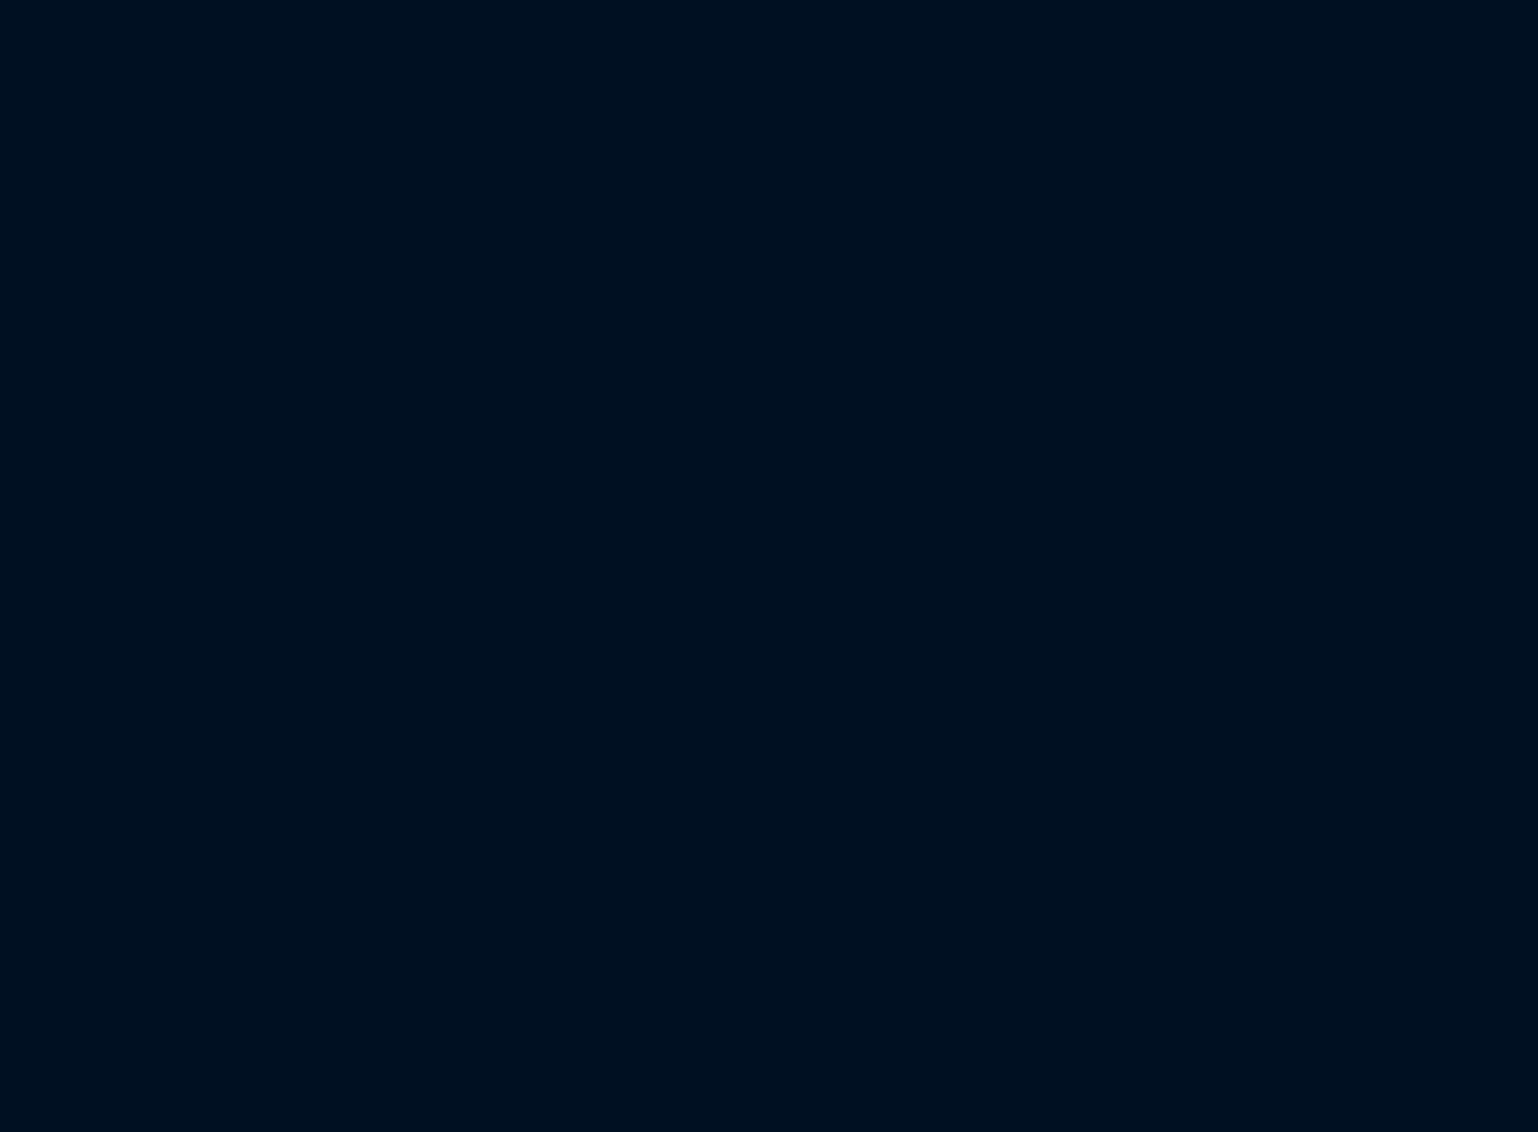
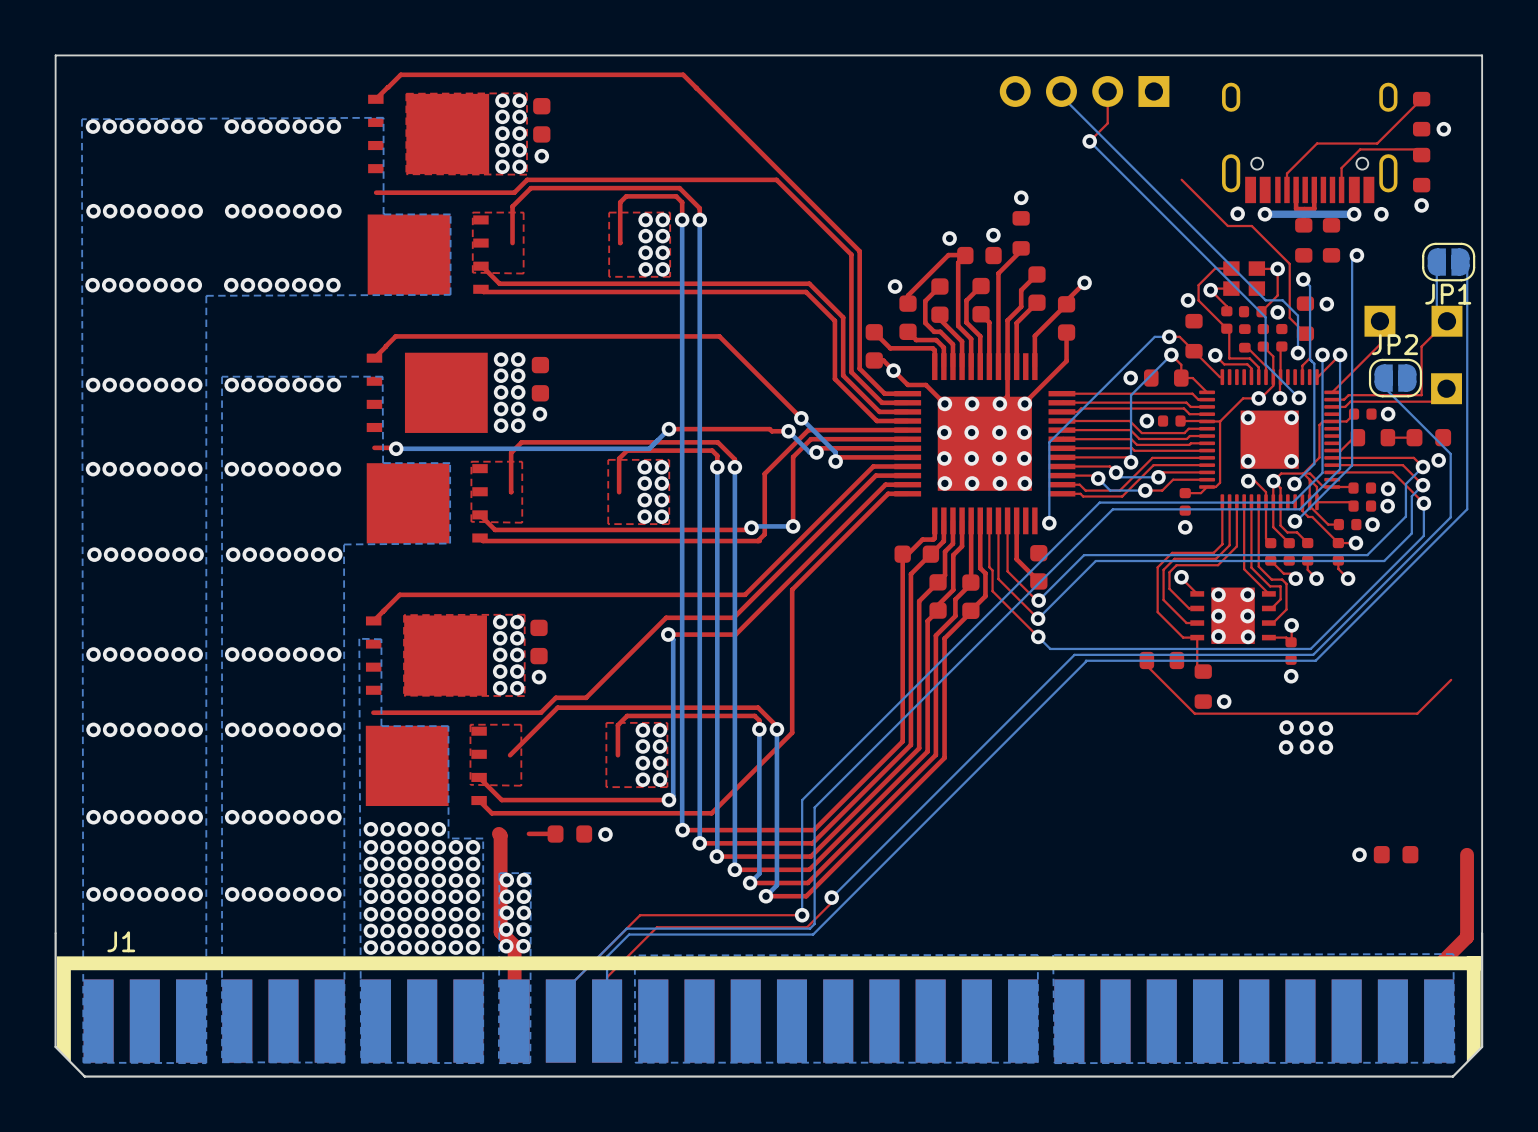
bottom track: none -> (1061, 91) (1061, 96) (1265, 300) (1282, 300) (1298, 315) (1298, 353)
part: none -> (1084, 91)
top track: none -> (1107, 91) (1107, 123) (1089, 141)
top zone outline: none -> (526, 93) (526, 174) (406, 174) (406, 93) (526, 93)
top track: none -> (375, 99) (400, 74) (683, 74) (859, 251) (859, 368) (884, 393) (907, 393)
top track: none -> (1421, 99) (1377, 143) (1317, 143) (1286, 173) (1286, 189)
via: none -> (502, 100)
via: none -> (519, 100)
part: none -> (1421, 114)
via: none -> (502, 116)
via: none -> (519, 116)
bottom zone outline: none -> (383, 117) (383, 214) (450, 214) (450, 294) (206, 295) (206, 1063) (83, 1062) (81, 119) (383, 117)
part: none -> (541, 120)
via: none -> (93, 126)
via: none -> (109, 126)
via: none -> (126, 126)
via: none -> (143, 126)
via: none -> (161, 126)
via: none -> (178, 126)
via: none -> (195, 126)
via: none -> (231, 126)
via: none -> (248, 126)
via: none -> (265, 126)
via: none -> (282, 126)
via: none -> (299, 126)
via: none -> (316, 126)
via: none -> (333, 126)
via: none -> (1443, 129)
part: none -> (428, 133)
via: none -> (502, 133)
via: none -> (519, 133)
bottom track: none -> (1089, 141) (1265, 317) (1265, 364) (1298, 397)
via: none -> (1089, 141)
part: none -> (1309, 142)
via: none -> (502, 150)
via: none -> (519, 150)
top track: none -> (1421, 155) (1415, 149) (1360, 149) (1341, 168) (1341, 189)
via: none -> (541, 156)
via: none -> (502, 166)
via: none -> (519, 166)
part: none -> (1421, 170)
top track: none -> (1181, 179) (1227, 226) (1251, 226) (1289, 263) (1289, 317) (1310, 338) (1310, 358) (1302, 365) (1302, 377)
top track: none -> (1314, 189) (1313, 209) (1296, 208) (1296, 189)
top track: none -> (376, 192) (514, 192) (527, 179) (776, 179) (851, 254) (851, 372) (882, 402) (907, 402)
via: none -> (1021, 197)
via: none -> (1421, 205)
via: none -> (93, 211)
via: none -> (110, 211)
via: none -> (127, 211)
via: none -> (144, 211)
via: none -> (161, 211)
via: none -> (178, 211)
via: none -> (195, 211)
via: none -> (232, 211)
via: none -> (248, 211)
via: none -> (265, 211)
via: none -> (283, 211)
via: none -> (300, 211)
via: none -> (317, 211)
via: none -> (334, 211)
top zone outline: none -> (523, 212) (523, 273) (472, 272) (472, 212) (523, 212)
top zone outline: none -> (670, 212) (609, 212) (609, 276) (670, 276) (670, 212)
via: none -> (1237, 213)
via: none -> (1264, 214)
bottom track: none -> (1354, 214) (1264, 214)
via: none -> (1354, 214)
via: none -> (1381, 214)
via: none -> (645, 219)
via: none -> (662, 219)
top track: none -> (682, 219) (682, 202) (676, 196) (626, 196) (620, 202) (620, 242)
bottom track: none -> (682, 219) (682, 830)
via: none -> (682, 219)
top track: none -> (699, 219) (699, 208) (679, 188) (530, 188) (512, 206) (512, 243)
bottom track: none -> (699, 219) (699, 843)
via: none -> (699, 219)
part: none -> (1021, 233)
via: none -> (993, 235)
via: none -> (645, 236)
via: none -> (662, 236)
via: none -> (949, 238)
part: none -> (1303, 240)
part: none -> (1331, 240)
top track: none -> (1021, 248) (1021, 250) (998, 273) (998, 366)
via: none -> (645, 252)
via: none -> (662, 252)
part: none -> (428, 254)
part: none -> (979, 255)
bottom track: none -> (1356, 255) (1352, 260) (1352, 465) (1294, 521)
via: none -> (1356, 255)
bottom track: none -> (1436, 262) (1436, 311) (1446, 321)
JP1: none -> (1448, 262)
bottom track: none -> (1460, 262) (1467, 268) (1467, 509) (1315, 660) (1085, 660) (813, 934) (629, 934) (607, 956) (607, 1021)
top track: none -> (480, 266) (499, 283) (809, 283) (843, 317) (843, 375) (879, 411) (907, 411)
top track: none -> (1231, 268) (1215, 268) (1198, 285) (1198, 300) (1229, 331) (1229, 358) (1249, 358) (1258, 367) (1258, 377)
top track: none -> (1256, 268) (1277, 268) (1277, 295) (1261, 311)
via: none -> (1277, 268)
via: none -> (645, 269)
via: none -> (662, 269)
top track: none -> (1036, 274) (1021, 290) (1021, 306) (1007, 320) (1007, 396) (999, 403)
part: none -> (1244, 278)
bottom track: none -> (1303, 279) (1310, 286) (1310, 359) (1314, 363) (1314, 464) (1294, 483)
via: none -> (1303, 279)
top track: none -> (1084, 282) (1034, 336) (1034, 366)
via: none -> (1084, 282)
via: none -> (92, 285)
via: none -> (109, 285)
via: none -> (126, 285)
via: none -> (143, 285)
via: none -> (160, 285)
via: none -> (177, 285)
via: none -> (194, 285)
via: none -> (231, 285)
via: none -> (247, 285)
via: none -> (265, 285)
via: none -> (282, 285)
via: none -> (299, 285)
via: none -> (316, 285)
via: none -> (333, 285)
via: none -> (895, 286)
top track: none -> (939, 286) (925, 301) (925, 322) (934, 331) (940, 331) (952, 344) (952, 366)
top track: none -> (981, 286) (966, 300) (966, 322) (980, 336) (980, 366)
part: none -> (1036, 288)
top track: none -> (1231, 288) (1210, 290) (1226, 306) (1226, 311)
top track: none -> (480, 289) (483, 291) (806, 291) (834, 320) (834, 378) (876, 421) (907, 421)
via: none -> (1210, 290)
part: none -> (939, 300)
part: none -> (981, 300)
via: none -> (1187, 300)
top track: none -> (1036, 302) (1016, 323) (1016, 366)
top track: none -> (908, 303) (908, 295) (948, 255) (964, 255) (958, 262) (958, 325) (971, 338) (971, 366)
via: none -> (1326, 304)
part: none -> (1252, 311)
via: none -> (1277, 312)
top track: none -> (939, 314) (939, 319) (962, 341) (962, 366)
top track: none -> (981, 314) (989, 322) (989, 366)
part: none -> (908, 317)
part: none -> (1066, 318)
part: none -> (1305, 318)
part: none -> (1226, 319)
top track: none -> (1379, 321) (1379, 344) (1332, 392)
part: none -> (1379, 321)
top track: none -> (1446, 321) (1421, 346) (1421, 395) (1348, 395) (1344, 399) (1332, 399)
part: none -> (1446, 321)
top track: none -> (908, 331) (916, 340) (936, 340) (943, 347) (943, 366)
top track: none -> (874, 332) (890, 348) (932, 348) (934, 350) (934, 366)
top track: none -> (1066, 332) (1066, 361) (1024, 403)
top track: none -> (1169, 336) (1179, 336) (1219, 377) (1222, 377)
bottom track: none -> (1169, 336) (1154, 336) (1049, 442) (1049, 523)
via: none -> (1169, 336)
part: none -> (1194, 336)
part: none -> (1263, 337)
part: none -> (1281, 337)
part: none -> (1244, 338)
part: none -> (874, 346)
top track: none -> (1263, 346) (1273, 356) (1273, 385) (1260, 398)
top track: none -> (1281, 346) (1279, 398)
top track: none -> (1244, 347) (1247, 347) (1266, 366) (1266, 377)
via: none -> (1298, 353)
top track: none -> (1171, 354) (1181, 364) (1181, 378) (1192, 378) (1207, 392)
bottom track: none -> (1171, 354) (1131, 395) (1131, 462)
via: none -> (1171, 354)
bottom track: none -> (1322, 354) (1322, 472) (1292, 502) (1099, 502) (802, 800) (802, 915)
via: none -> (1322, 354)
top track: none -> (1340, 354) (1316, 377)
bottom track: none -> (1340, 354) (1340, 469) (1299, 509) (1112, 509) (814, 807) (814, 924) (810, 928) (626, 928) (560, 994) (560, 1021)
via: none -> (1340, 354)
top track: none -> (1215, 355) (1224, 364) (1247, 364) (1251, 368) (1251, 377)
via: none -> (1215, 355)
top track: none -> (374, 358) (395, 336) (719, 336) (801, 418)
via: none -> (501, 359)
via: none -> (518, 359)
top track: none -> (874, 360) (883, 360) (907, 384) (925, 384) (944, 403)
via: none -> (893, 370)
via: none -> (501, 375)
via: none -> (518, 375)
bottom zone outline: none -> (382, 376) (383, 463) (450, 463) (450, 543) (344, 544) (344, 1062) (222, 1062) (222, 376) (382, 376)
via: none -> (1130, 378)
part: none -> (1166, 378)
bottom track: none -> (1383, 378) (1383, 386) (1450, 453) (1450, 517) (1313, 654) (1074, 654) (831, 897)
JP2: none -> (1395, 378)
part: none -> (540, 379)
via: none -> (93, 385)
via: none -> (109, 385)
via: none -> (126, 385)
via: none -> (143, 385)
via: none -> (161, 385)
via: none -> (178, 385)
via: none -> (195, 385)
via: none -> (231, 385)
via: none -> (248, 385)
via: none -> (265, 385)
via: none -> (282, 385)
via: none -> (299, 385)
via: none -> (316, 385)
via: none -> (333, 385)
top track: none -> (1446, 388) (1433, 401) (1350, 401) (1345, 406) (1332, 406)
part: none -> (1446, 388)
part: none -> (427, 392)
via: none -> (501, 392)
via: none -> (518, 392)
top track: none -> (1061, 393) (1192, 393) (1198, 399) (1207, 399)
via: none -> (1298, 397)
via: none -> (1258, 398)
top track: none -> (1262, 398) (1243, 398) (1220, 421)
via: none -> (1279, 398)
top track: none -> (1062, 402) (1186, 402) (1190, 406) (1207, 406)
via: none -> (944, 403)
via: none -> (972, 403)
via: none -> (999, 403)
via: none -> (1024, 403)
via: none -> (501, 409)
via: none -> (518, 409)
top track: none -> (1061, 411) (1077, 411) (1080, 408) (1184, 408) (1189, 414) (1207, 414)
via: none -> (539, 414)
top track: none -> (1354, 414) (1346, 421) (1322, 421) (1319, 424) (1319, 457) (1303, 473) (1316, 486) (1316, 502) (1349, 502) (1353, 506)
part: none -> (1362, 414)
via: none -> (1388, 414)
via: none -> (1248, 417)
via: none -> (1291, 417)
bottom track: none -> (801, 418) (835, 452) (835, 461)
via: none -> (801, 418)
top track: none -> (1061, 421) (1129, 421) (1141, 433) (1184, 433) (1188, 428) (1207, 428)
via: none -> (1146, 421)
part: none -> (1171, 421)
top track: none -> (1180, 421) (1220, 421)
top track: none -> (1220, 421) (1220, 482) (1215, 486) (1207, 486) (1200, 493) (1185, 493)
via: none -> (501, 425)
via: none -> (518, 425)
top track: none -> (668, 429) (769, 429) (771, 431) (788, 431)
bottom track: none -> (668, 429) (649, 448) (396, 448)
via: none -> (668, 429)
top track: none -> (907, 430) (808, 430) (764, 473) (764, 534) (757, 541)
top track: none -> (1061, 430) (1130, 430) (1139, 438) (1186, 438) (1189, 436) (1207, 436)
bottom track: none -> (788, 431) (809, 452) (816, 452)
via: none -> (788, 431)
via: none -> (944, 432)
via: none -> (971, 432)
via: none -> (999, 432)
via: none -> (1024, 432)
top track: none -> (1063, 437) (1061, 439) (1131, 439) (1136, 444) (1207, 443)
top track: none -> (1357, 437) (1353, 437) (1340, 450) (1332, 450)
part: none -> (1372, 437)
top track: none -> (1414, 437) (1387, 437)
part: none -> (1428, 437)
top track: none -> (907, 439) (811, 439) (793, 457) (793, 526)
part: none -> (1269, 439)
part: none -> (984, 443)
top track: none -> (374, 447) (396, 448)
via: none -> (396, 448)
top track: none -> (907, 448) (820, 448) (816, 452)
top track: none -> (1061, 448) (1206, 450)
via: none -> (816, 452)
top track: none -> (907, 457) (839, 457) (835, 461)
top track: none -> (1061, 457) (1126, 457) (1131, 462)
top track: none -> (1207, 457) (1152, 457) (1119, 490) (1085, 490) (1079, 484) (1061, 484)
top track: none -> (1332, 457) (1413, 457) (1422, 467)
via: none -> (944, 458)
via: none -> (971, 458)
via: none -> (999, 458)
via: none -> (1024, 458)
top zone outline: none -> (669, 459) (669, 524) (608, 524) (608, 459) (669, 459)
via: none -> (1438, 460)
top zone outline: none -> (522, 461) (522, 522) (471, 521) (471, 461) (522, 461)
via: none -> (835, 461)
via: none -> (1248, 461)
via: none -> (1291, 461)
via: none -> (1131, 462)
top track: none -> (1207, 465) (1153, 465) (1122, 496) (1083, 496) (1080, 493) (1061, 493)
top track: none -> (1332, 465) (1402, 465) (1422, 485)
top track: none -> (907, 466) (873, 466) (745, 594) (399, 594) (373, 620)
top track: none -> (1061, 466) (1109, 466) (1116, 472)
via: none -> (644, 467)
via: none -> (661, 467)
top track: none -> (717, 467) (717, 455) (712, 450) (627, 450) (619, 458) (619, 492)
bottom track: none -> (717, 467) (716, 856)
via: none -> (717, 467)
top track: none -> (734, 467) (734, 459) (717, 442) (521, 442) (511, 452) (511, 492)
bottom track: none -> (734, 467) (734, 869)
via: none -> (734, 467)
bottom track: none -> (1422, 467) (1405, 484) (1405, 516) (1367, 555) (1084, 555) (1038, 600)
via: none -> (1422, 467)
via: none -> (93, 469)
via: none -> (109, 469)
via: none -> (126, 469)
via: none -> (143, 469)
via: none -> (161, 469)
via: none -> (178, 469)
via: none -> (195, 469)
via: none -> (231, 469)
via: none -> (248, 469)
via: none -> (265, 469)
via: none -> (282, 469)
via: none -> (299, 469)
via: none -> (316, 469)
via: none -> (333, 469)
bottom track: none -> (1116, 472) (1120, 477) (1158, 477)
via: none -> (1116, 472)
top track: none -> (1207, 472) (1163, 472) (1158, 477)
top track: none -> (1332, 472) (1392, 472) (1423, 503)
top track: none -> (907, 475) (875, 475) (733, 617) (666, 617) (586, 697)
top track: none -> (1061, 475) (1095, 475) (1098, 478)
via: none -> (1158, 477)
bottom track: none -> (1098, 478) (1110, 490) (1145, 490)
via: none -> (1098, 478)
top track: none -> (1207, 479) (1173, 479) (1162, 490) (1145, 490)
top track: none -> (1309, 479) (1309, 506) (1328, 524) (1338, 524)
top track: none -> (1248, 481) (1254, 481) (1266, 492) (1266, 538) (1270, 543)
via: none -> (1248, 481)
top track: none -> (1273, 481) (1280, 488) (1280, 525) (1287, 532) (1297, 532) (1307, 543)
via: none -> (1273, 481)
via: none -> (644, 483)
via: none -> (661, 483)
via: none -> (944, 483)
via: none -> (972, 483)
via: none -> (999, 483)
via: none -> (1024, 483)
via: none -> (1294, 483)
top track: none -> (907, 484) (885, 484) (735, 634) (668, 634)
bottom track: none -> (1422, 485) (1411, 496) (1411, 533) (1384, 561) (1095, 561) (1038, 618)
via: none -> (1422, 485)
top track: none -> (1353, 488) (1323, 486) (1310, 473) (1281, 473) (1273, 481) (1273, 527) (1289, 543)
part: none -> (1362, 488)
via: none -> (1388, 488)
via: none -> (1145, 490)
top track: none -> (907, 493) (888, 493) (792, 589) (792, 732) (711, 813) (491, 813) (479, 800)
via: none -> (644, 500)
via: none -> (661, 500)
part: none -> (1185, 501)
top track: none -> (1222, 502) (1222, 544)
top track: none -> (1229, 502) (1229, 545) (1216, 558) (1174, 558) (1163, 569) (1163, 599) (1186, 623) (1197, 623)
top track: none -> (1236, 502) (1236, 546) (1218, 565) (1176, 565) (1169, 572) (1169, 588) (1189, 608) (1197, 608)
top track: none -> (1244, 502) (1244, 569) (1268, 593)
top track: none -> (1251, 502) (1251, 567) (1270, 586) (1280, 586) (1280, 599) (1271, 608) (1268, 608)
top track: none -> (1258, 502) (1258, 566) (1271, 579) (1282, 579) (1286, 583) (1286, 609) (1273, 623) (1268, 623)
top track: none -> (1302, 502) (1302, 510) (1308, 516) (1312, 516) (1338, 543) (1355, 543)
part: none -> (427, 503)
bottom track: none -> (1423, 503) (1423, 535) (1310, 648) (1050, 648) (1038, 636)
via: none -> (1423, 503)
part: none -> (1362, 506)
via: none -> (1387, 506)
top track: none -> (480, 514) (495, 529) (749, 529) (751, 527)
via: none -> (644, 516)
via: none -> (661, 516)
top track: none -> (934, 520) (934, 538) (922, 539) (908, 554) (902, 554) (902, 741) (814, 830) (682, 830)
top track: none -> (943, 520) (943, 541) (910, 574) (910, 744) (812, 843) (699, 843)
top track: none -> (952, 520) (952, 543) (945, 551) (945, 575) (919, 601) (919, 748) (810, 856) (716, 856)
top track: none -> (962, 520) (962, 546) (953, 555) (953, 589) (938, 605) (938, 610) (927, 620) (927, 751) (809, 869) (734, 869)
top track: none -> (971, 520) (970, 584) (955, 599) (955, 616) (935, 635) (935, 754) (807, 883) (750, 883)
top track: none -> (980, 520) (980, 568) (985, 573) (985, 596) (944, 638) (944, 757) (806, 896) (766, 896)
top track: none -> (989, 520) (989, 567) (992, 570) (992, 591) (1038, 636)
top track: none -> (998, 520) (998, 579) (1038, 618)
top track: none -> (1007, 520) (1007, 571) (1038, 600)
top track: none -> (1016, 520) (1016, 559) (1038, 581)
via: none -> (1294, 521)
via: none -> (1049, 523)
part: none -> (1347, 524)
via: none -> (1372, 524)
bottom track: none -> (793, 526) (751, 527)
via: none -> (793, 526)
via: none -> (751, 527)
via: none -> (1185, 527)
top track: none -> (480, 537) (483, 541) (759, 541)
via: none -> (1355, 543)
top track: none -> (1222, 544) (1213, 552) (1172, 552) (1157, 567) (1157, 612) (1183, 637) (1197, 637) (1197, 665) (1203, 671)
part: none -> (1270, 551)
part: none -> (1289, 551)
part: none -> (1307, 551)
part: none -> (1338, 551)
via: none -> (94, 554)
via: none -> (111, 554)
via: none -> (128, 554)
via: none -> (145, 554)
via: none -> (162, 554)
via: none -> (179, 554)
via: none -> (196, 554)
via: none -> (233, 554)
via: none -> (249, 554)
via: none -> (266, 554)
via: none -> (283, 554)
via: none -> (301, 554)
via: none -> (318, 554)
via: none -> (335, 554)
part: none -> (916, 554)
top track: none -> (1270, 560) (1283, 573) (1290, 573)
top track: none -> (1307, 560) (1307, 569) (1316, 578)
top track: none -> (1338, 560) (1338, 568) (1348, 578)
part: none -> (1038, 567)
top track: none -> (1181, 577) (1197, 593)
via: none -> (1181, 577)
via: none -> (1295, 578)
via: none -> (1316, 578)
via: none -> (1348, 578)
via: none -> (1218, 594)
via: none -> (1247, 594)
part: none -> (938, 596)
part: none -> (970, 596)
via: none -> (1038, 600)
top zone outline: none -> (524, 614) (524, 696) (404, 695) (404, 615) (524, 614)
part: none -> (1233, 615)
via: none -> (1218, 616)
via: none -> (1247, 616)
via: none -> (1038, 618)
via: none -> (500, 622)
via: none -> (517, 622)
top track: none -> (1291, 625) (1291, 642) (1286, 637) (1268, 637)
via: none -> (1291, 625)
bottom track: none -> (668, 634) (673, 639) (673, 795) (668, 800)
via: none -> (668, 634)
via: none -> (1038, 636)
via: none -> (1218, 636)
via: none -> (1248, 636)
bottom zone outline: none -> (359, 638) (381, 639) (381, 726) (448, 726) (448, 838) (483, 838) (482, 1063) (361, 1062) (359, 638)
via: none -> (500, 638)
via: none -> (517, 638)
part: none -> (539, 641)
part: none -> (1291, 651)
via: none -> (93, 654)
via: none -> (110, 654)
via: none -> (127, 654)
via: none -> (144, 654)
via: none -> (161, 654)
via: none -> (178, 654)
via: none -> (195, 654)
via: none -> (232, 654)
via: none -> (248, 654)
via: none -> (265, 654)
via: none -> (283, 654)
via: none -> (300, 654)
via: none -> (317, 654)
via: none -> (334, 654)
via: none -> (500, 654)
via: none -> (517, 654)
part: none -> (426, 655)
top track: none -> (1146, 660) (1146, 665) (1194, 713) (1417, 713) (1451, 679)
part: none -> (1161, 660)
via: none -> (500, 671)
via: none -> (517, 671)
via: none -> (1291, 676)
via: none -> (539, 677)
part: none -> (1203, 686)
via: none -> (500, 688)
via: none -> (517, 688)
top track: none -> (586, 697) (555, 697) (540, 712) (373, 712)
via: none -> (1224, 701)
top zone outline: none -> (667, 722) (667, 787) (606, 787) (606, 722) (667, 722)
top zone outline: none -> (521, 724) (521, 785) (470, 784) (470, 724) (521, 724)
via: none -> (1286, 727)
via: none -> (1306, 728)
via: none -> (1325, 728)
via: none -> (93, 729)
via: none -> (110, 729)
via: none -> (127, 729)
via: none -> (144, 729)
via: none -> (161, 729)
via: none -> (178, 729)
via: none -> (195, 729)
via: none -> (232, 729)
via: none -> (248, 729)
via: none -> (265, 729)
via: none -> (283, 729)
via: none -> (300, 729)
via: none -> (317, 729)
via: none -> (334, 729)
top track: none -> (759, 729) (759, 720) (754, 715) (627, 715) (617, 725) (617, 755)
bottom track: none -> (759, 729) (759, 873) (750, 883)
via: none -> (759, 729)
top track: none -> (776, 729) (776, 726) (758, 707) (557, 707) (510, 755)
bottom track: none -> (776, 729) (776, 885) (766, 896)
via: none -> (776, 729)
via: none -> (642, 730)
via: none -> (659, 730)
via: none -> (642, 746)
via: none -> (659, 746)
via: none -> (1306, 746)
via: none -> (1286, 747)
via: none -> (1325, 747)
via: none -> (642, 763)
via: none -> (659, 763)
part: none -> (426, 765)
top track: none -> (479, 777) (501, 800) (668, 800)
via: none -> (642, 779)
via: none -> (659, 779)
via: none -> (668, 800)
via: none -> (93, 817)
via: none -> (110, 817)
via: none -> (127, 817)
via: none -> (144, 817)
via: none -> (161, 817)
via: none -> (178, 817)
via: none -> (195, 817)
via: none -> (232, 817)
via: none -> (248, 817)
via: none -> (265, 817)
via: none -> (283, 817)
via: none -> (300, 817)
via: none -> (317, 817)
via: none -> (334, 817)
via: none -> (370, 829)
via: none -> (387, 829)
via: none -> (404, 829)
via: none -> (421, 829)
via: none -> (438, 829)
via: none -> (682, 830)
top track: none -> (498, 833) (500, 835) (500, 932) (514, 946) (514, 1021)
top track: none -> (555, 833) (528, 833)
part: none -> (569, 834)
via: none -> (605, 834)
via: none -> (699, 843)
via: none -> (370, 847)
via: none -> (387, 847)
via: none -> (404, 847)
via: none -> (421, 847)
via: none -> (438, 847)
via: none -> (455, 847)
via: none -> (473, 847)
via: none -> (1359, 854)
part: none -> (1396, 854)
top track: none -> (1467, 854) (1467, 937) (1442, 961)
via: none -> (716, 856)
via: none -> (370, 863)
via: none -> (387, 863)
via: none -> (404, 863)
via: none -> (421, 863)
via: none -> (438, 863)
via: none -> (455, 863)
via: none -> (473, 863)
via: none -> (734, 869)
bottom zone outline: none -> (530, 873) (530, 1063) (498, 1063) (499, 873) (530, 873)
via: none -> (370, 880)
via: none -> (387, 880)
via: none -> (404, 880)
via: none -> (421, 880)
via: none -> (438, 880)
via: none -> (455, 880)
via: none -> (473, 880)
via: none -> (506, 880)
via: none -> (523, 880)
via: none -> (750, 883)
via: none -> (93, 894)
via: none -> (110, 894)
via: none -> (127, 894)
via: none -> (144, 894)
via: none -> (161, 894)
via: none -> (178, 894)
via: none -> (195, 894)
via: none -> (232, 894)
via: none -> (248, 894)
via: none -> (265, 894)
via: none -> (283, 894)
via: none -> (300, 894)
via: none -> (317, 894)
via: none -> (334, 894)
via: none -> (370, 896)
via: none -> (387, 896)
via: none -> (404, 896)
via: none -> (421, 896)
via: none -> (438, 896)
via: none -> (455, 896)
via: none -> (473, 896)
via: none -> (506, 896)
via: none -> (523, 896)
via: none -> (766, 896)
top track: none -> (831, 897) (831, 902) (807, 927) (657, 927) (607, 977) (607, 1021)
via: none -> (831, 897)
via: none -> (506, 912)
via: none -> (523, 912)
via: none -> (370, 914)
via: none -> (387, 914)
via: none -> (404, 914)
via: none -> (421, 914)
via: none -> (438, 914)
via: none -> (455, 914)
via: none -> (473, 914)
top track: none -> (802, 915) (640, 915) (560, 994) (560, 1021)
via: none -> (802, 915)
via: none -> (506, 929)
via: none -> (523, 929)
via: none -> (370, 930)
via: none -> (387, 930)
via: none -> (404, 930)
via: none -> (421, 930)
via: none -> (438, 930)
via: none -> (455, 930)
via: none -> (473, 930)
board edge: none -> (1482, 933) (1482, 55) (55, 55) (55, 933)
via: none -> (506, 946)
via: none -> (523, 946)
via: none -> (370, 947)
via: none -> (387, 947)
via: none -> (404, 947)
via: none -> (421, 947)
via: none -> (438, 947)
via: none -> (455, 947)
via: none -> (473, 947)
bottom zone outline: none -> (1037, 954) (1037, 1062) (635, 1062) (634, 955) (1037, 954)
bottom zone outline: none -> (1453, 954) (1454, 1062) (1054, 1063) (1053, 954) (1453, 954)
J1: none -> (768, 1004)

